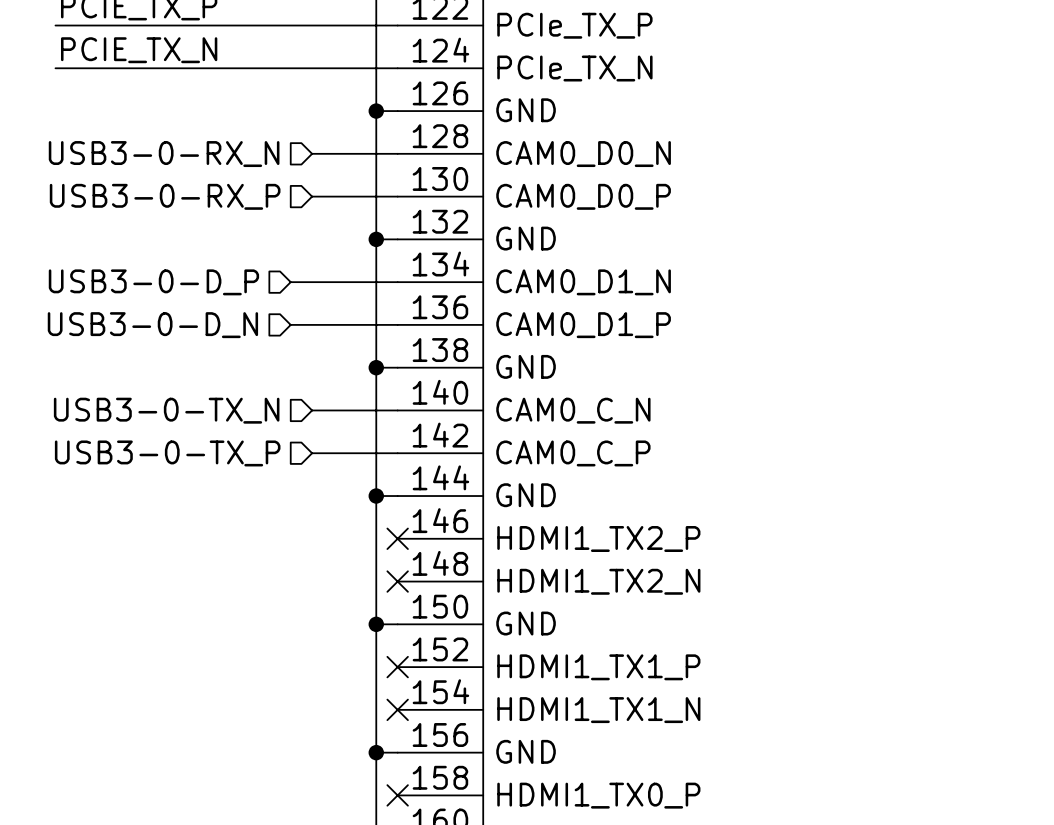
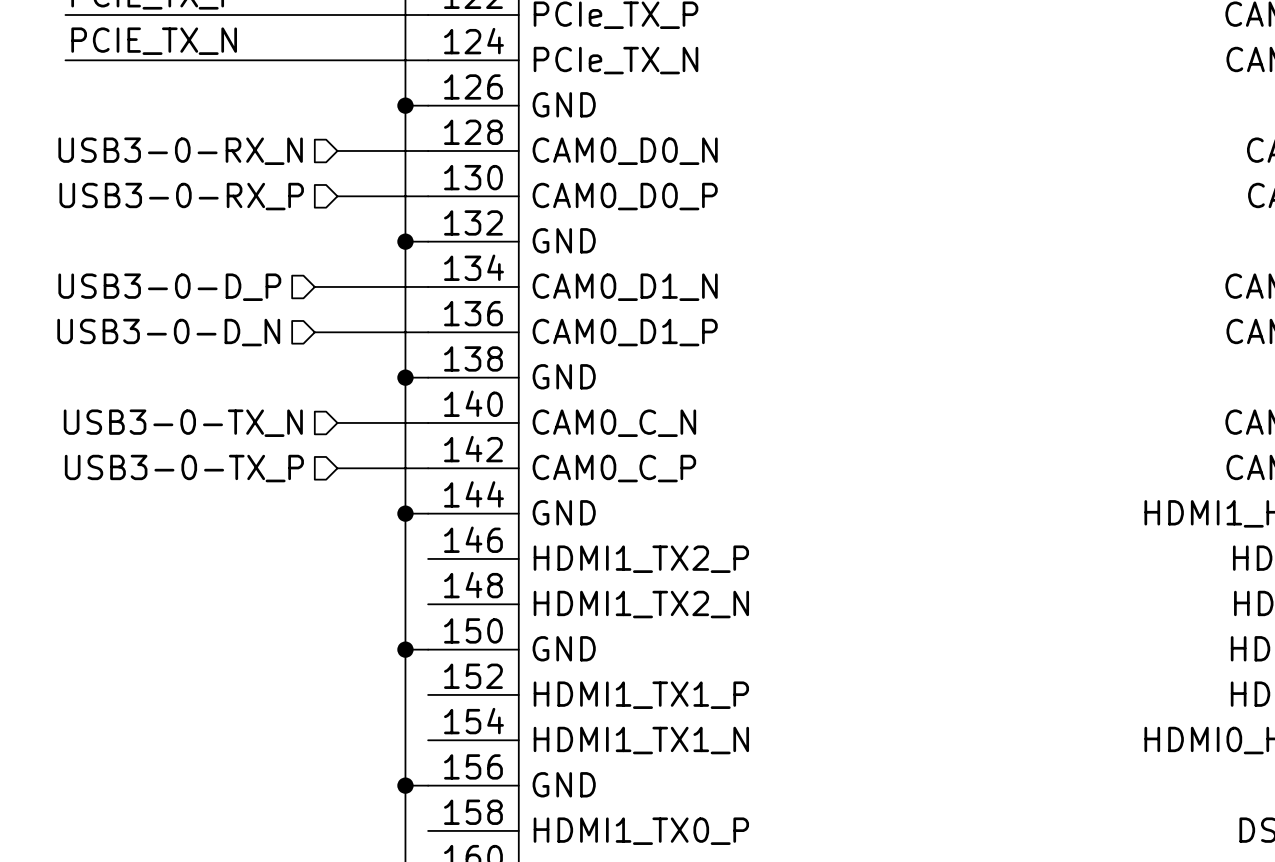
no-connect mark: (397, 538) -> none
no-connect mark: (397, 581) -> none
no-connect mark: (397, 667) -> none
no-connect mark: (397, 709) -> none
no-connect mark: (397, 795) -> none

